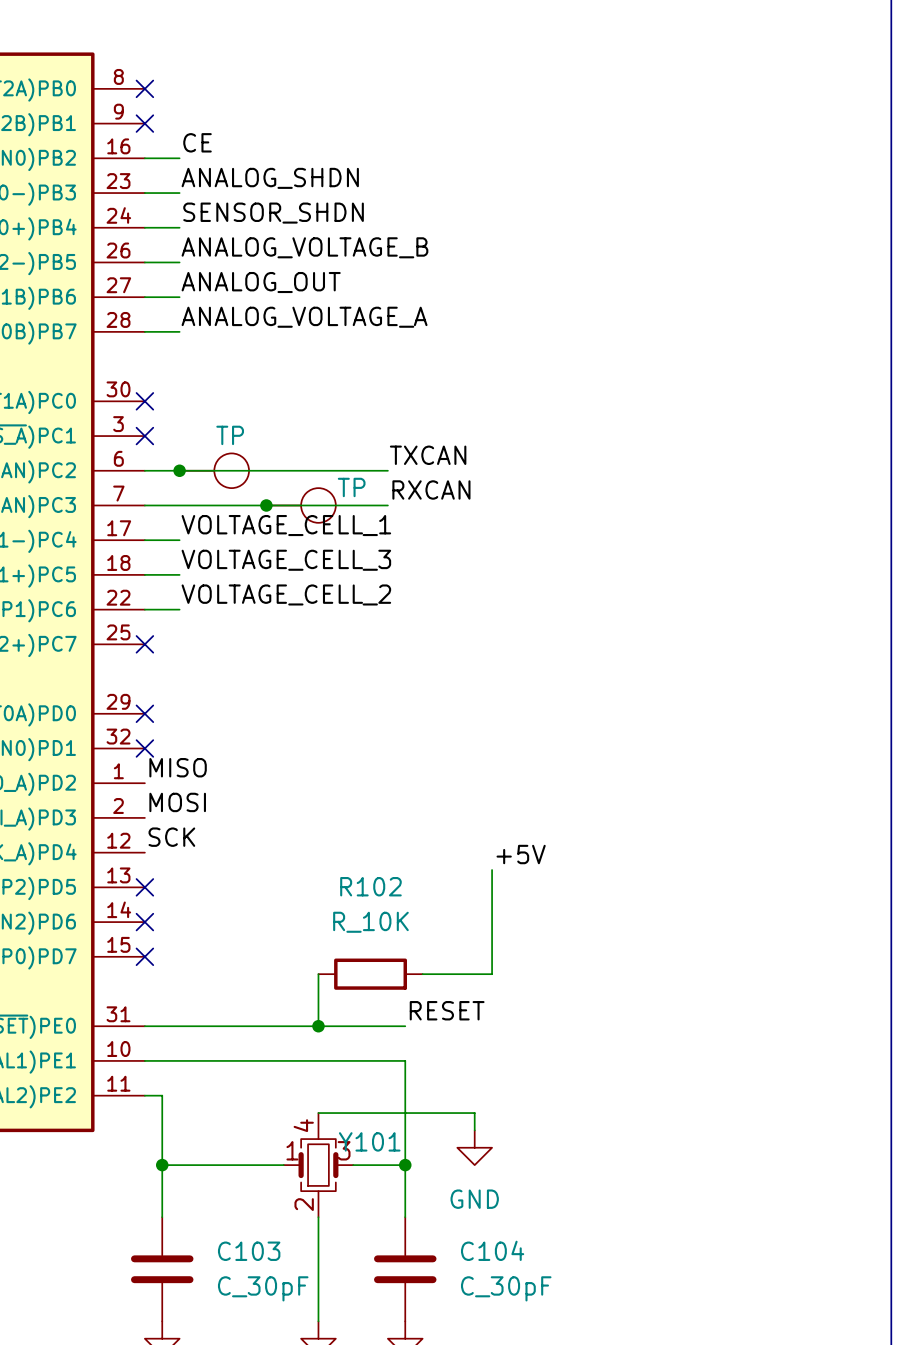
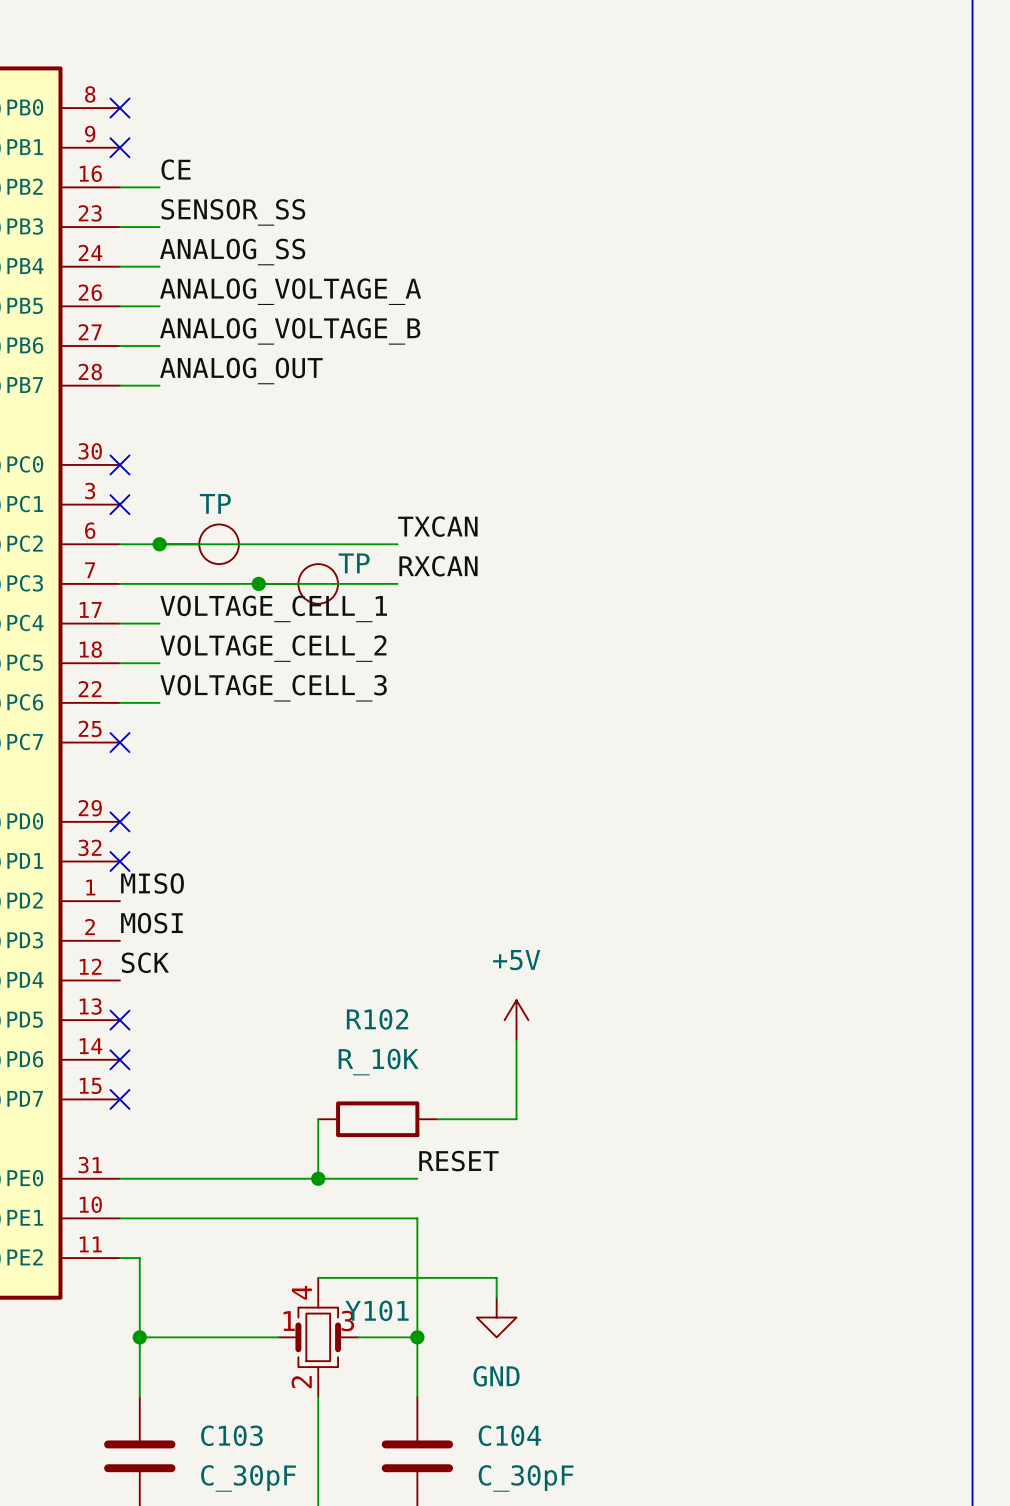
label: ANALOG_SHDN (270, 178) -> SENSOR_SS (233, 212)
label: SENSOR_SHDN (273, 213) -> ANALOG_SS (232, 252)
label: ANALOG_VOLTAGE_B (304, 247) -> ANALOG_VOLTAGE_A (290, 291)
label: ANALOG_OUT (261, 282) -> ANALOG_VOLTAGE_B (290, 331)
label: ANALOG_VOLTAGE_A (304, 317) -> ANALOG_OUT (241, 370)
label: VOLTAGE_CELL_3 (286, 560) -> VOLTAGE_CELL_2 (273, 648)
label: VOLTAGE_CELL_2 (286, 594) -> VOLTAGE_CELL_3 (273, 688)
label: +5V (521, 854) -> none
power symbol: none -> +5V (516, 1020)

